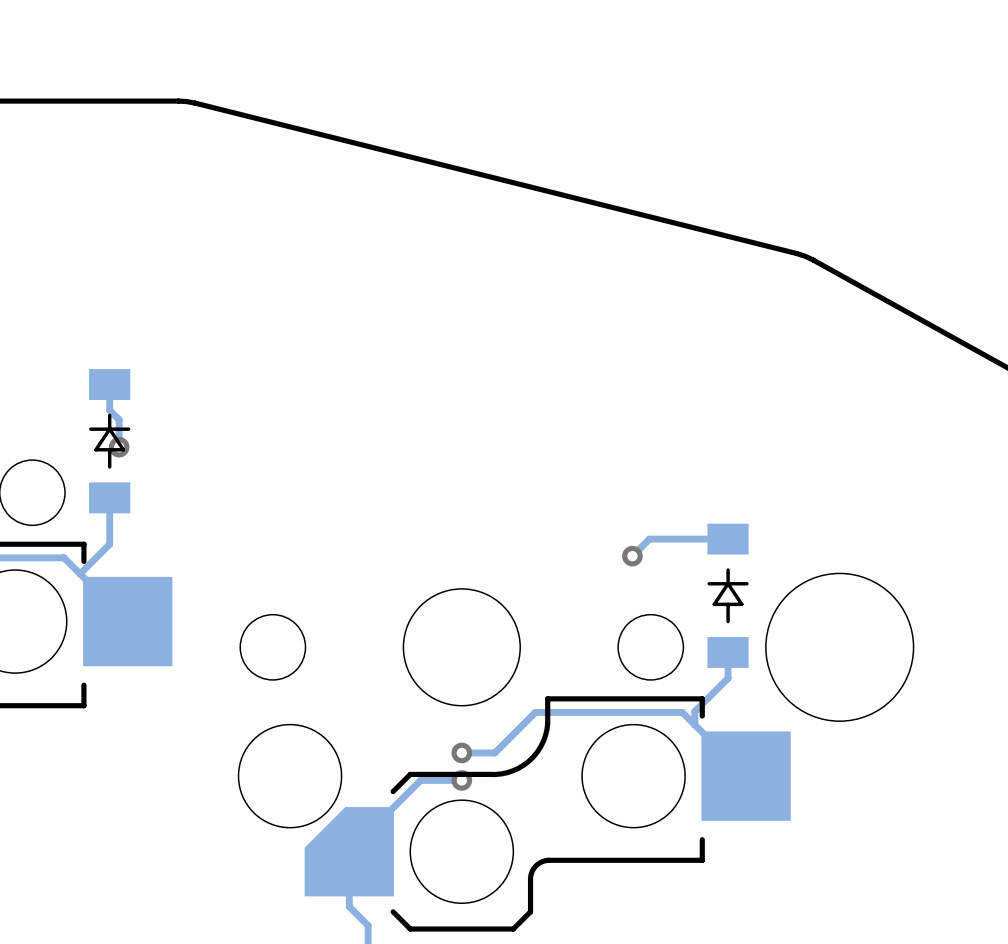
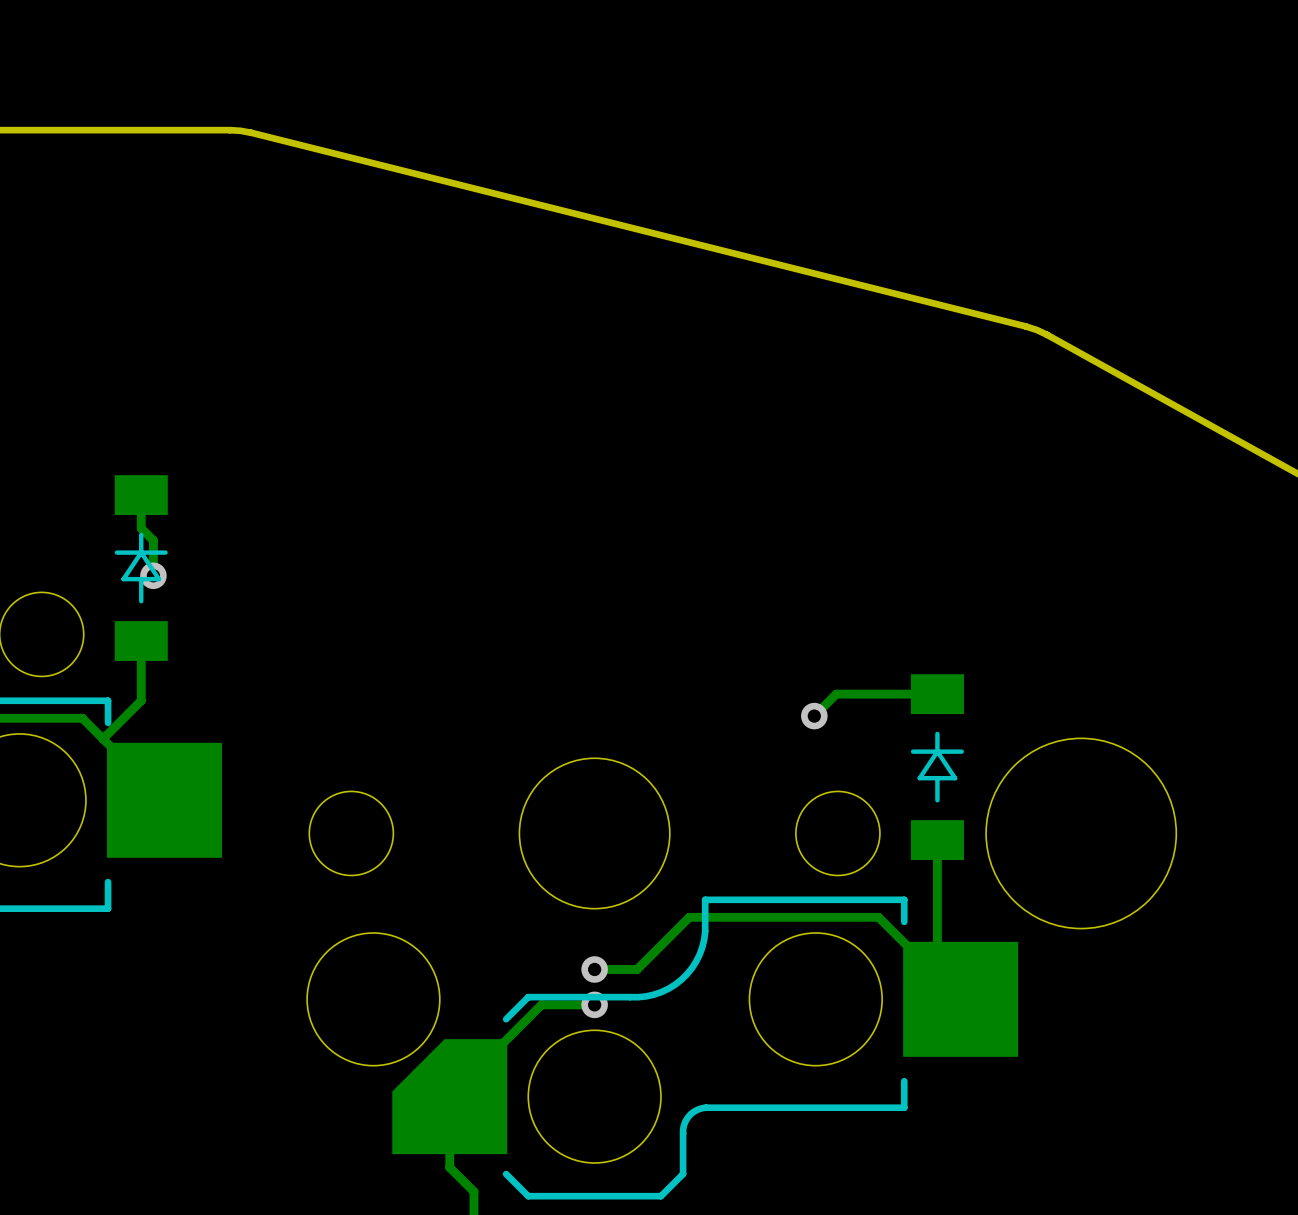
track: (728, 678) (694, 711) (694, 724) -> (937, 873) (936, 975)

